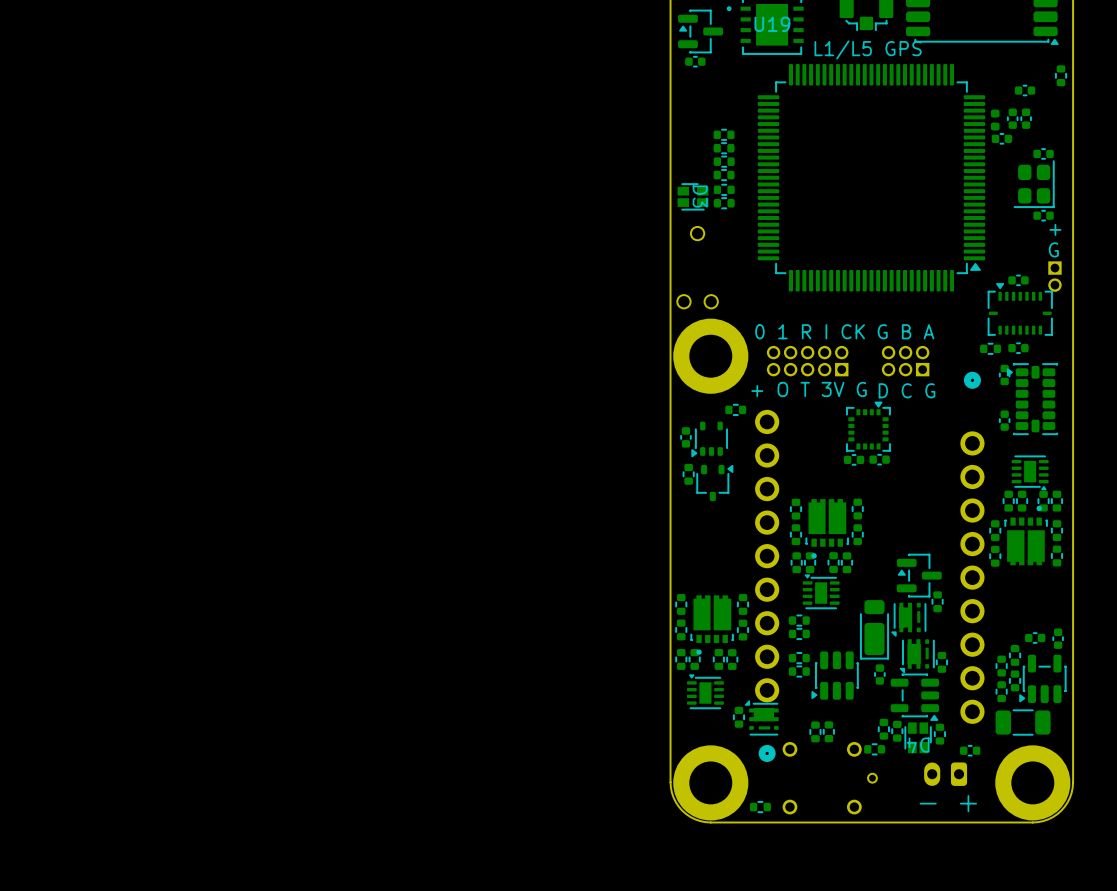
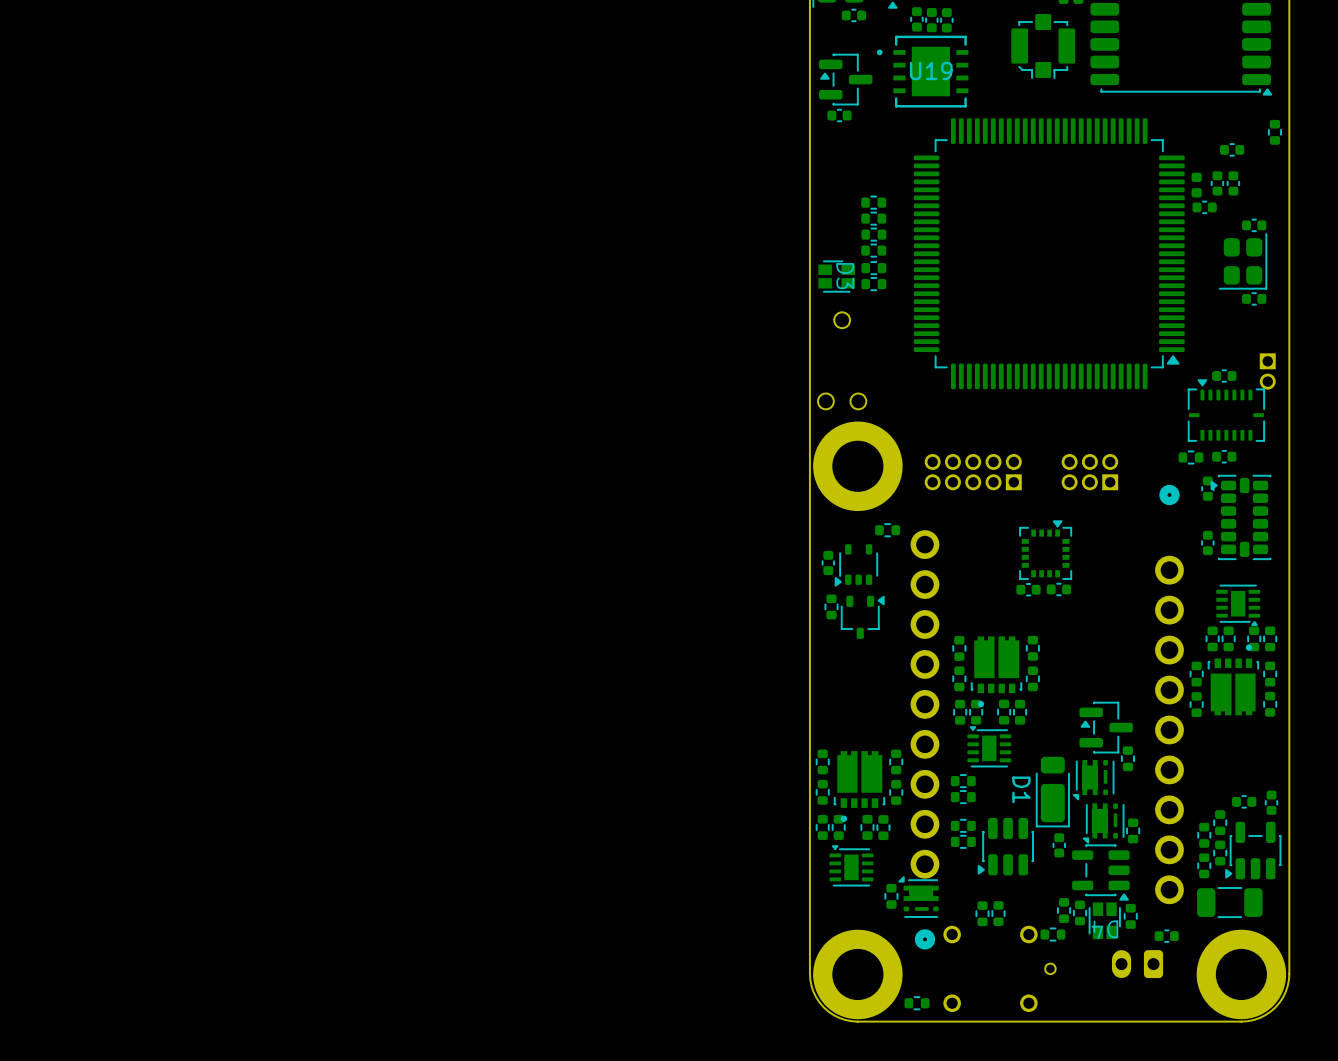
text: L1/L5 GPS (868, 49) -> none
text: + (1055, 229) -> none
text: G (1053, 249) -> none
text: 0 1 R I CK (810, 331) -> none
text: G B A (905, 331) -> none
text: + O T 3V G (809, 389) -> none
text: D C G (907, 390) -> none
D1 name: none -> D1 (1021, 789)
text: - + (948, 803) -> none

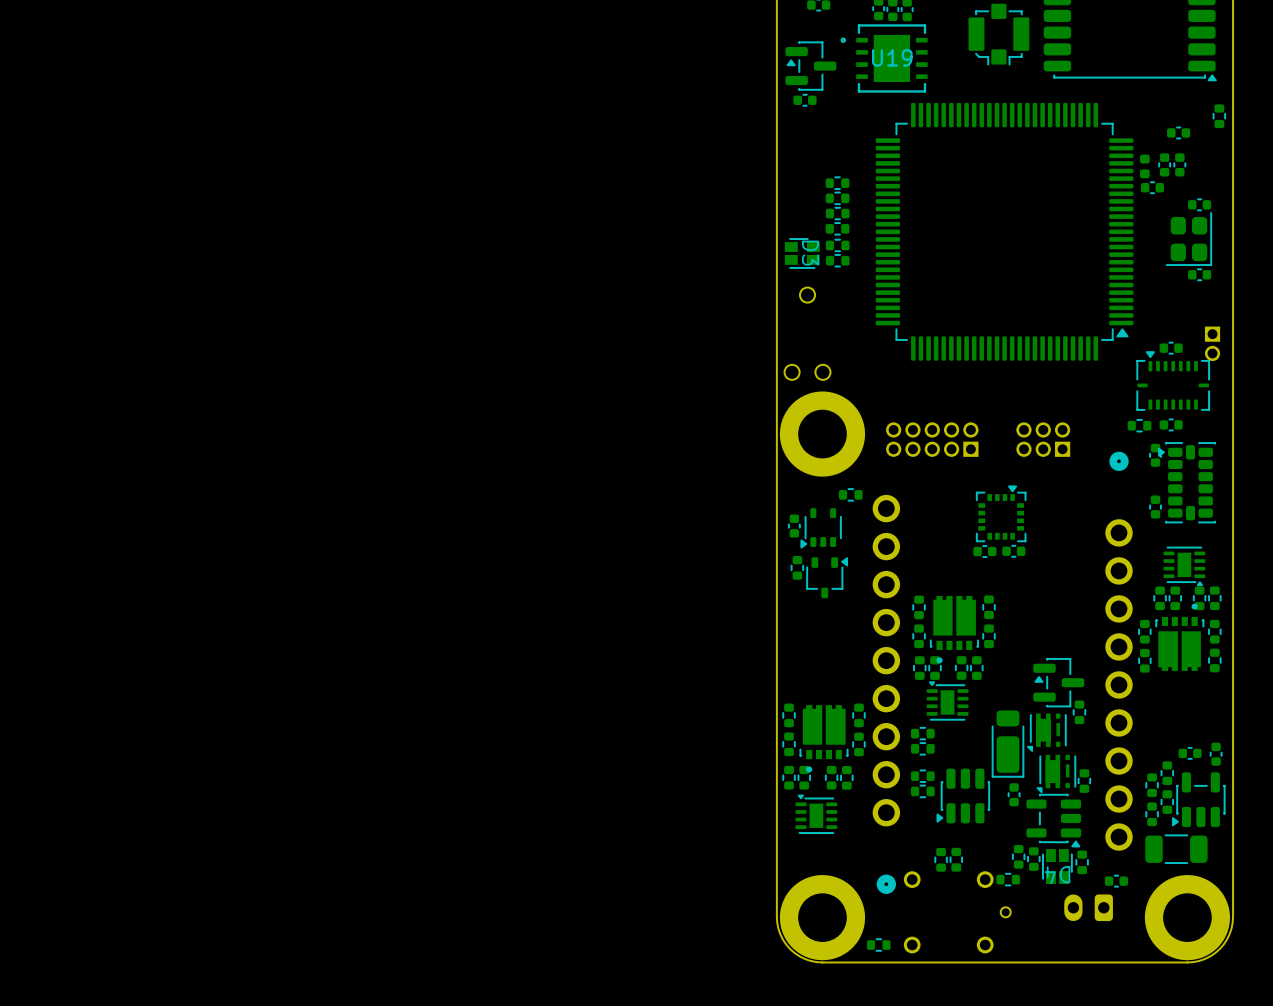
D1 name: D1 (1021, 789) -> none
part: (891, 896) -> none
part: (918, 897) -> none

